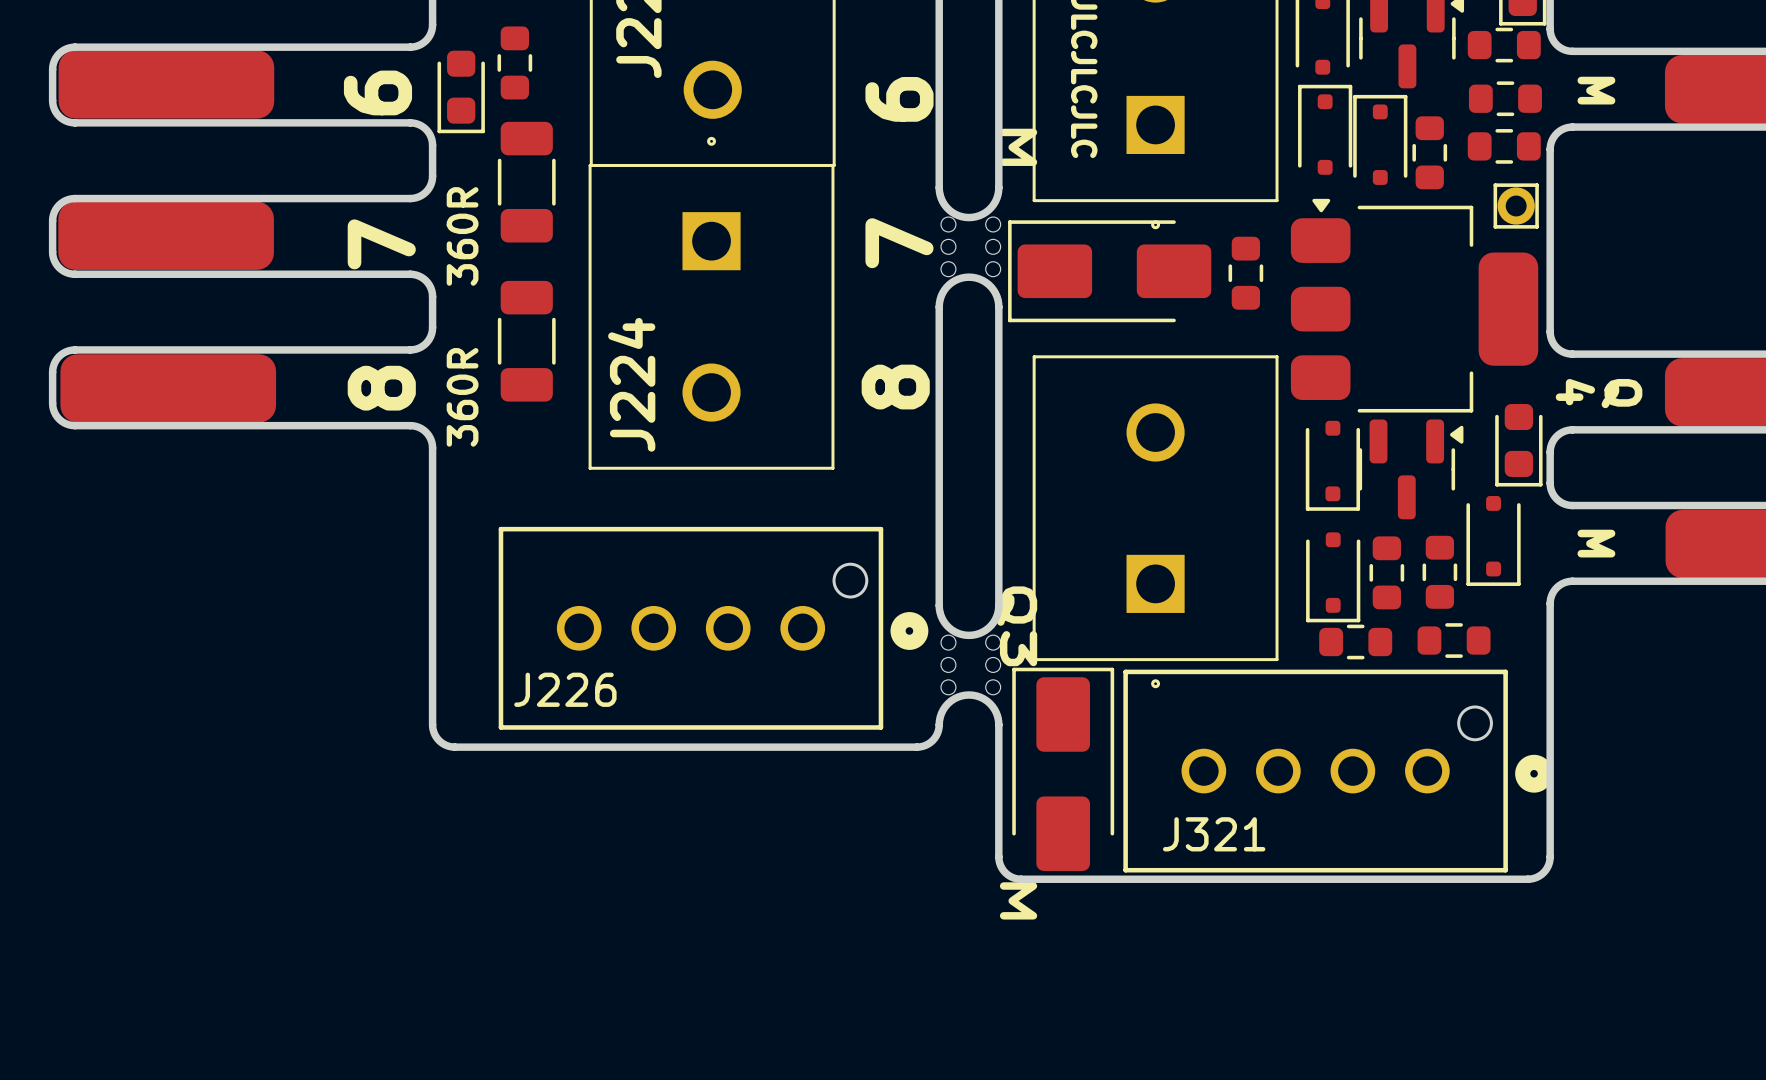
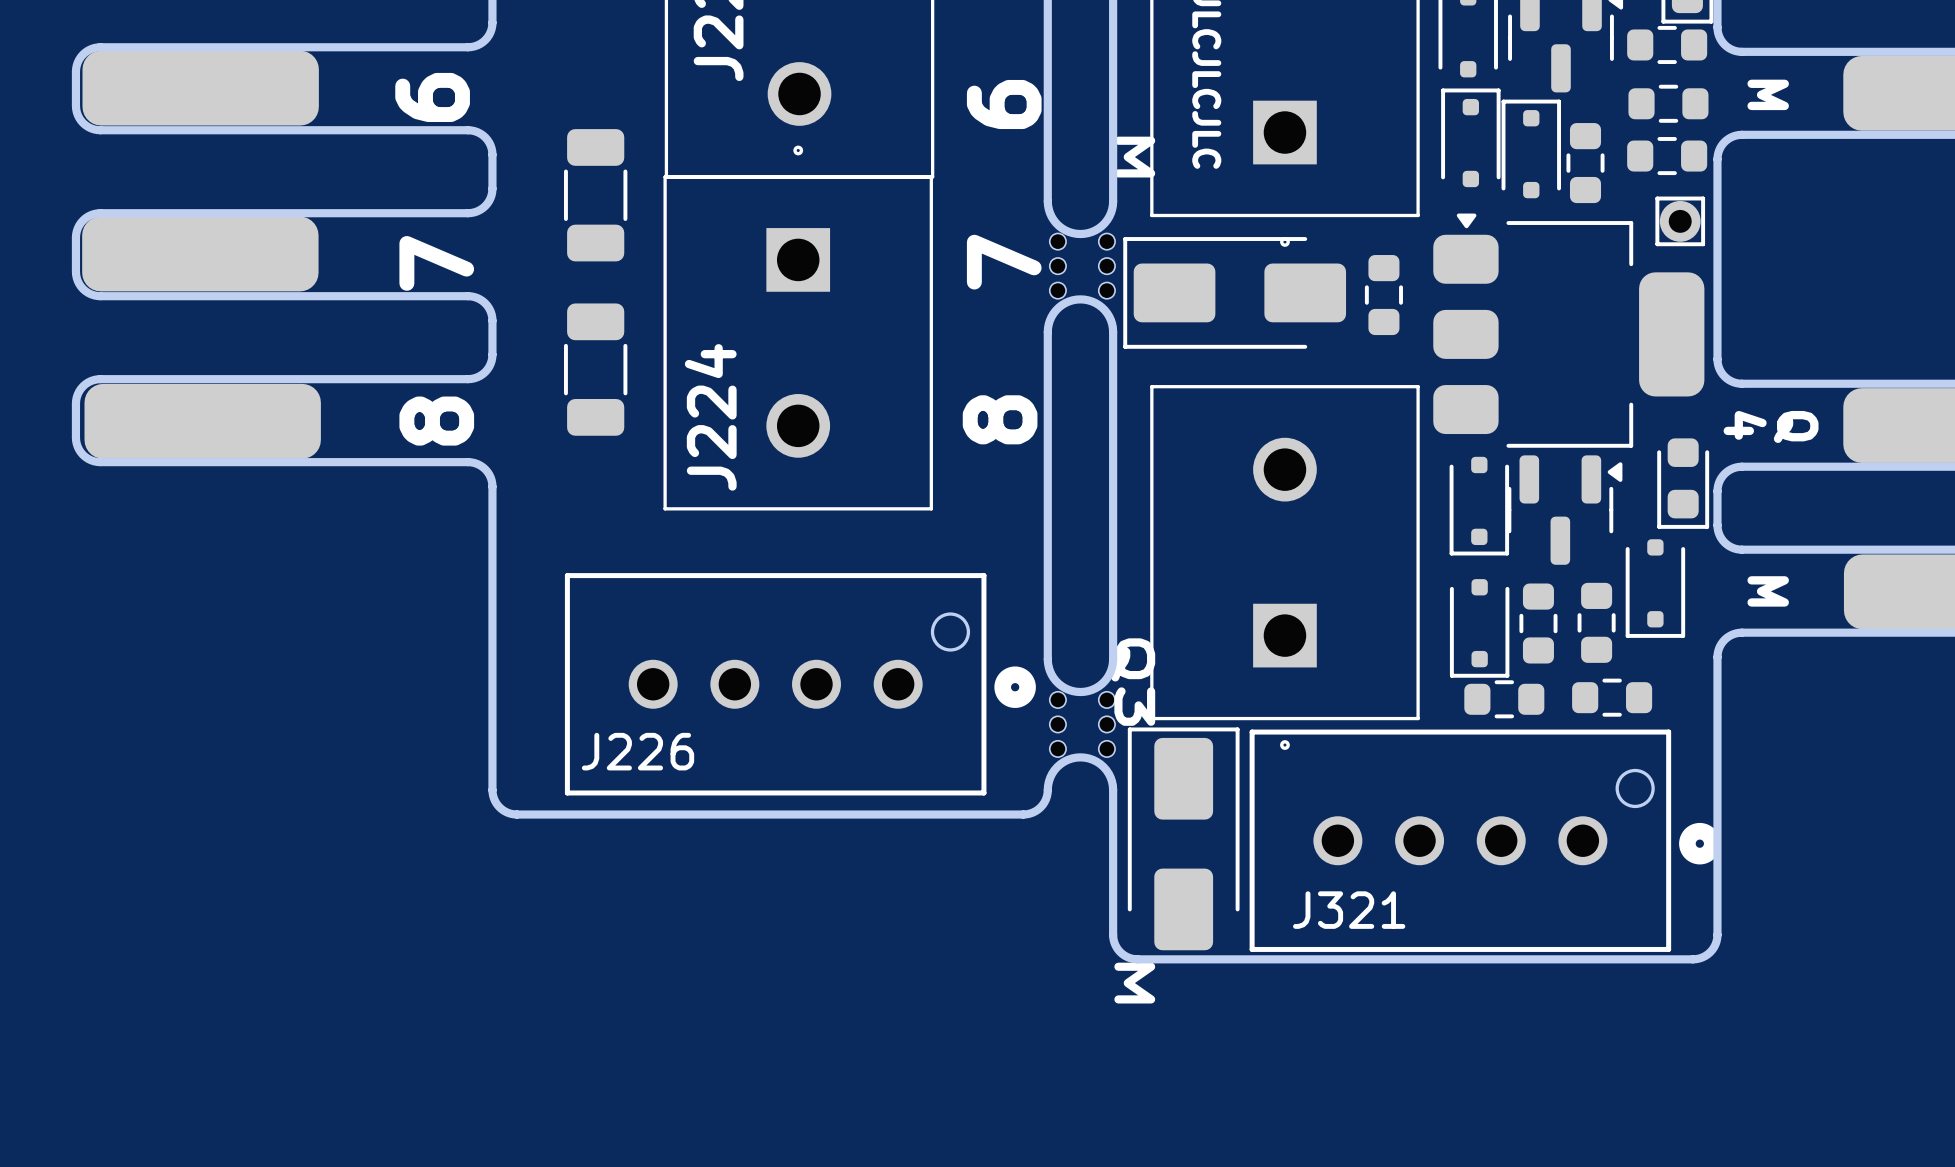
part: (514, 62) -> none
part: (461, 91) -> none
text: 360R (462, 236) -> none
text: 360R (462, 397) -> none

